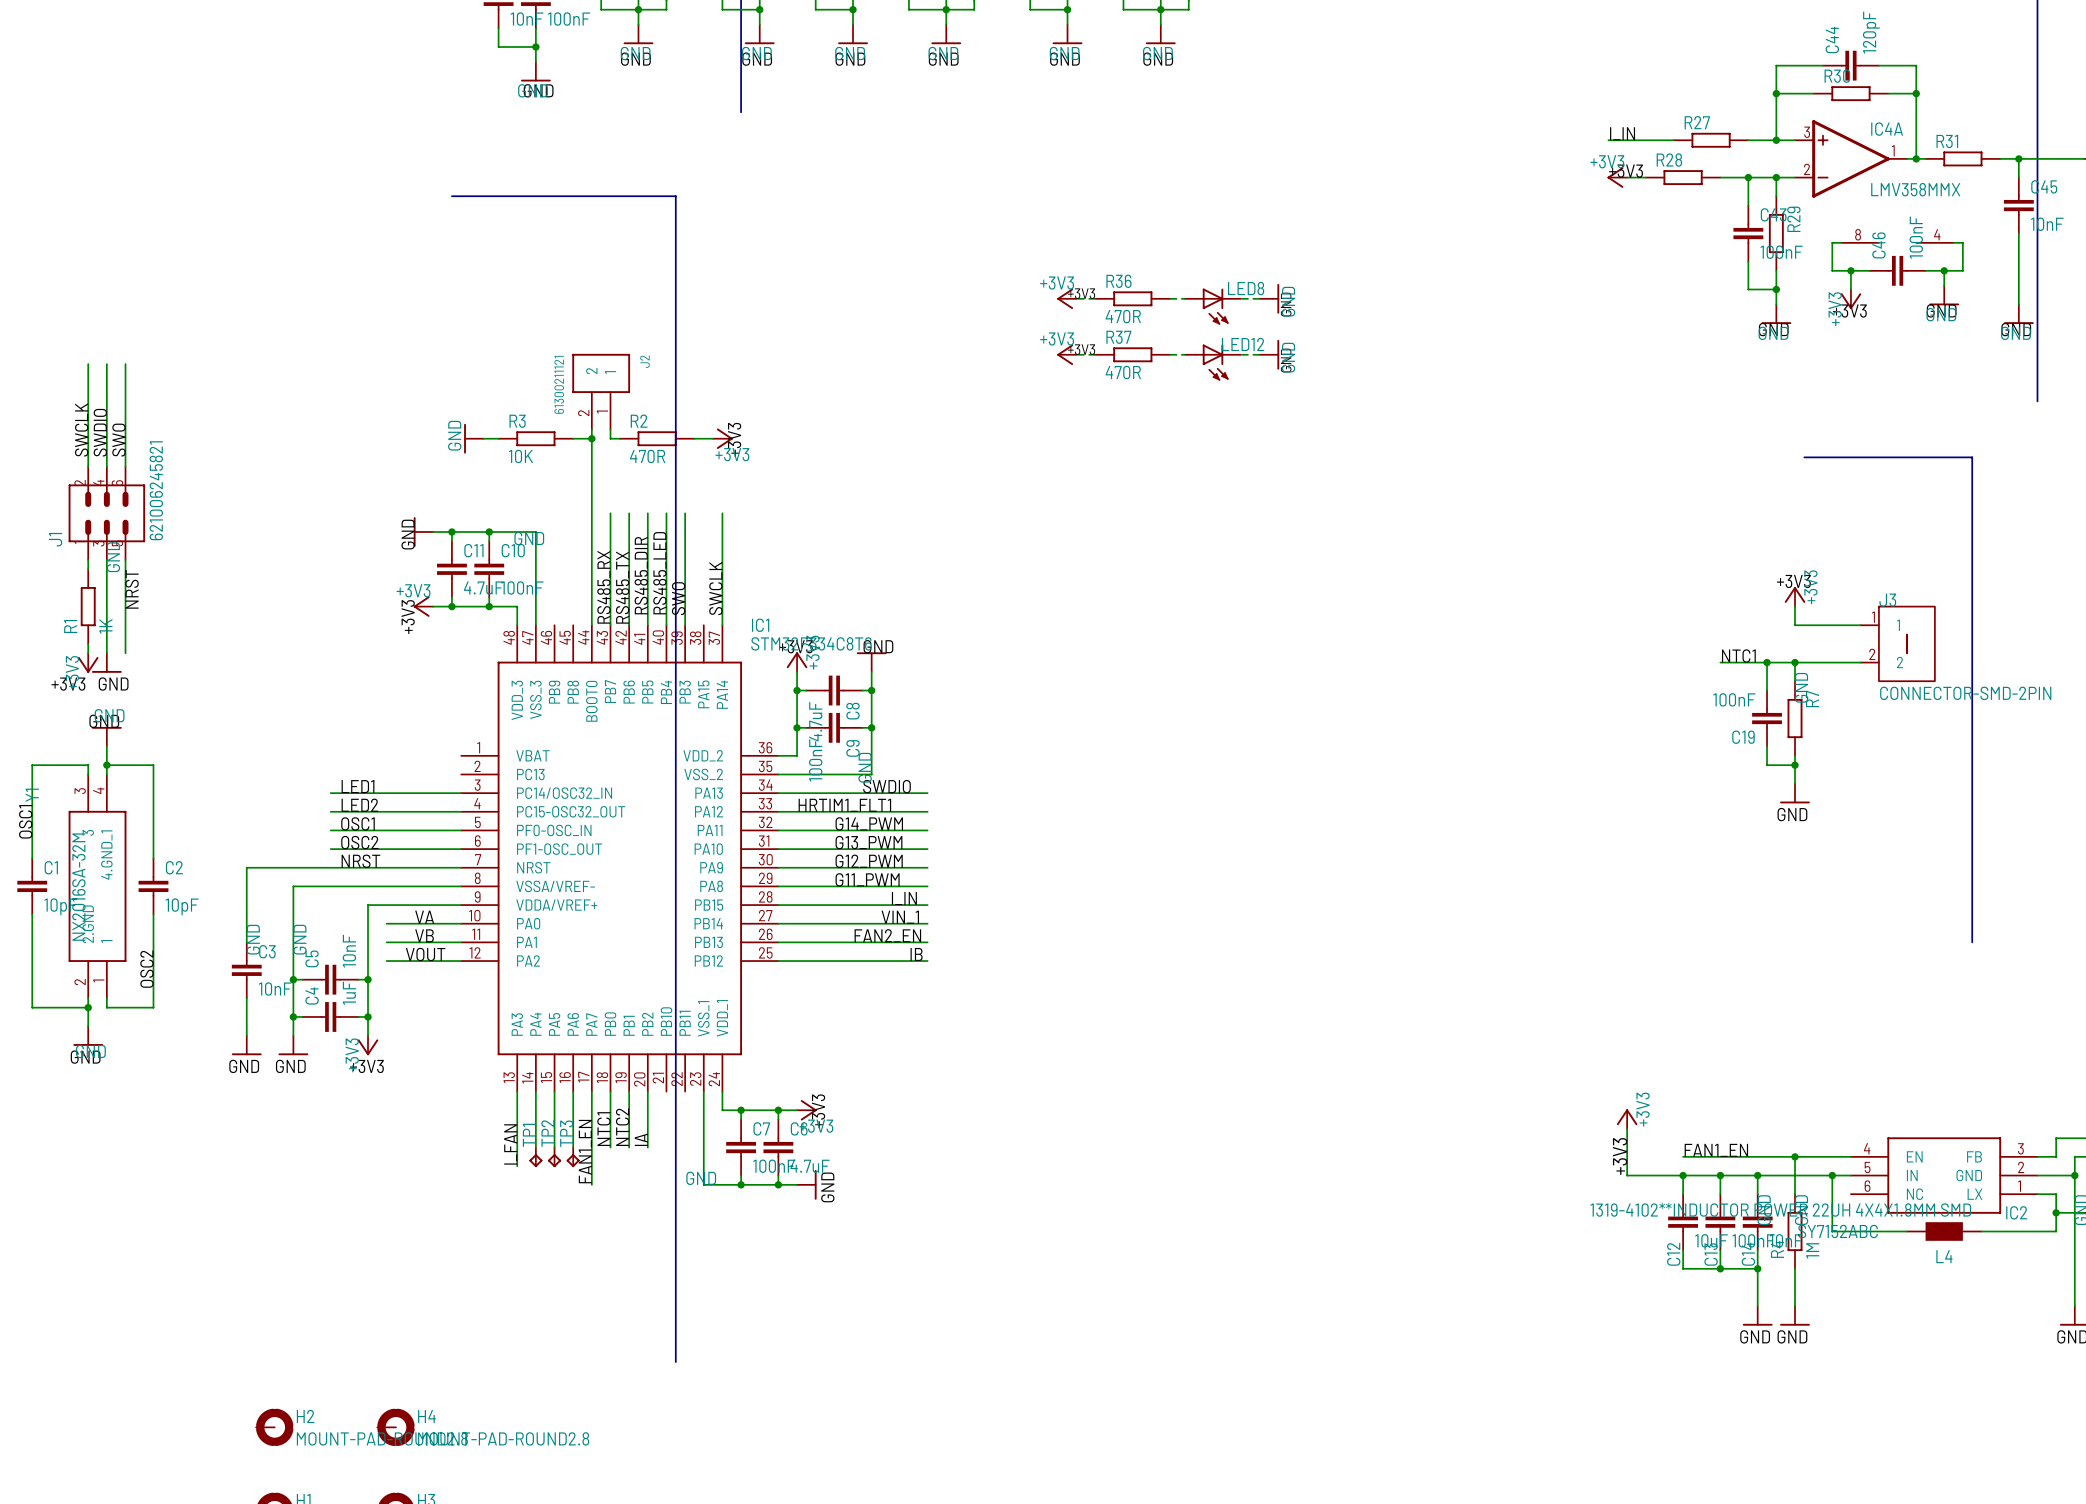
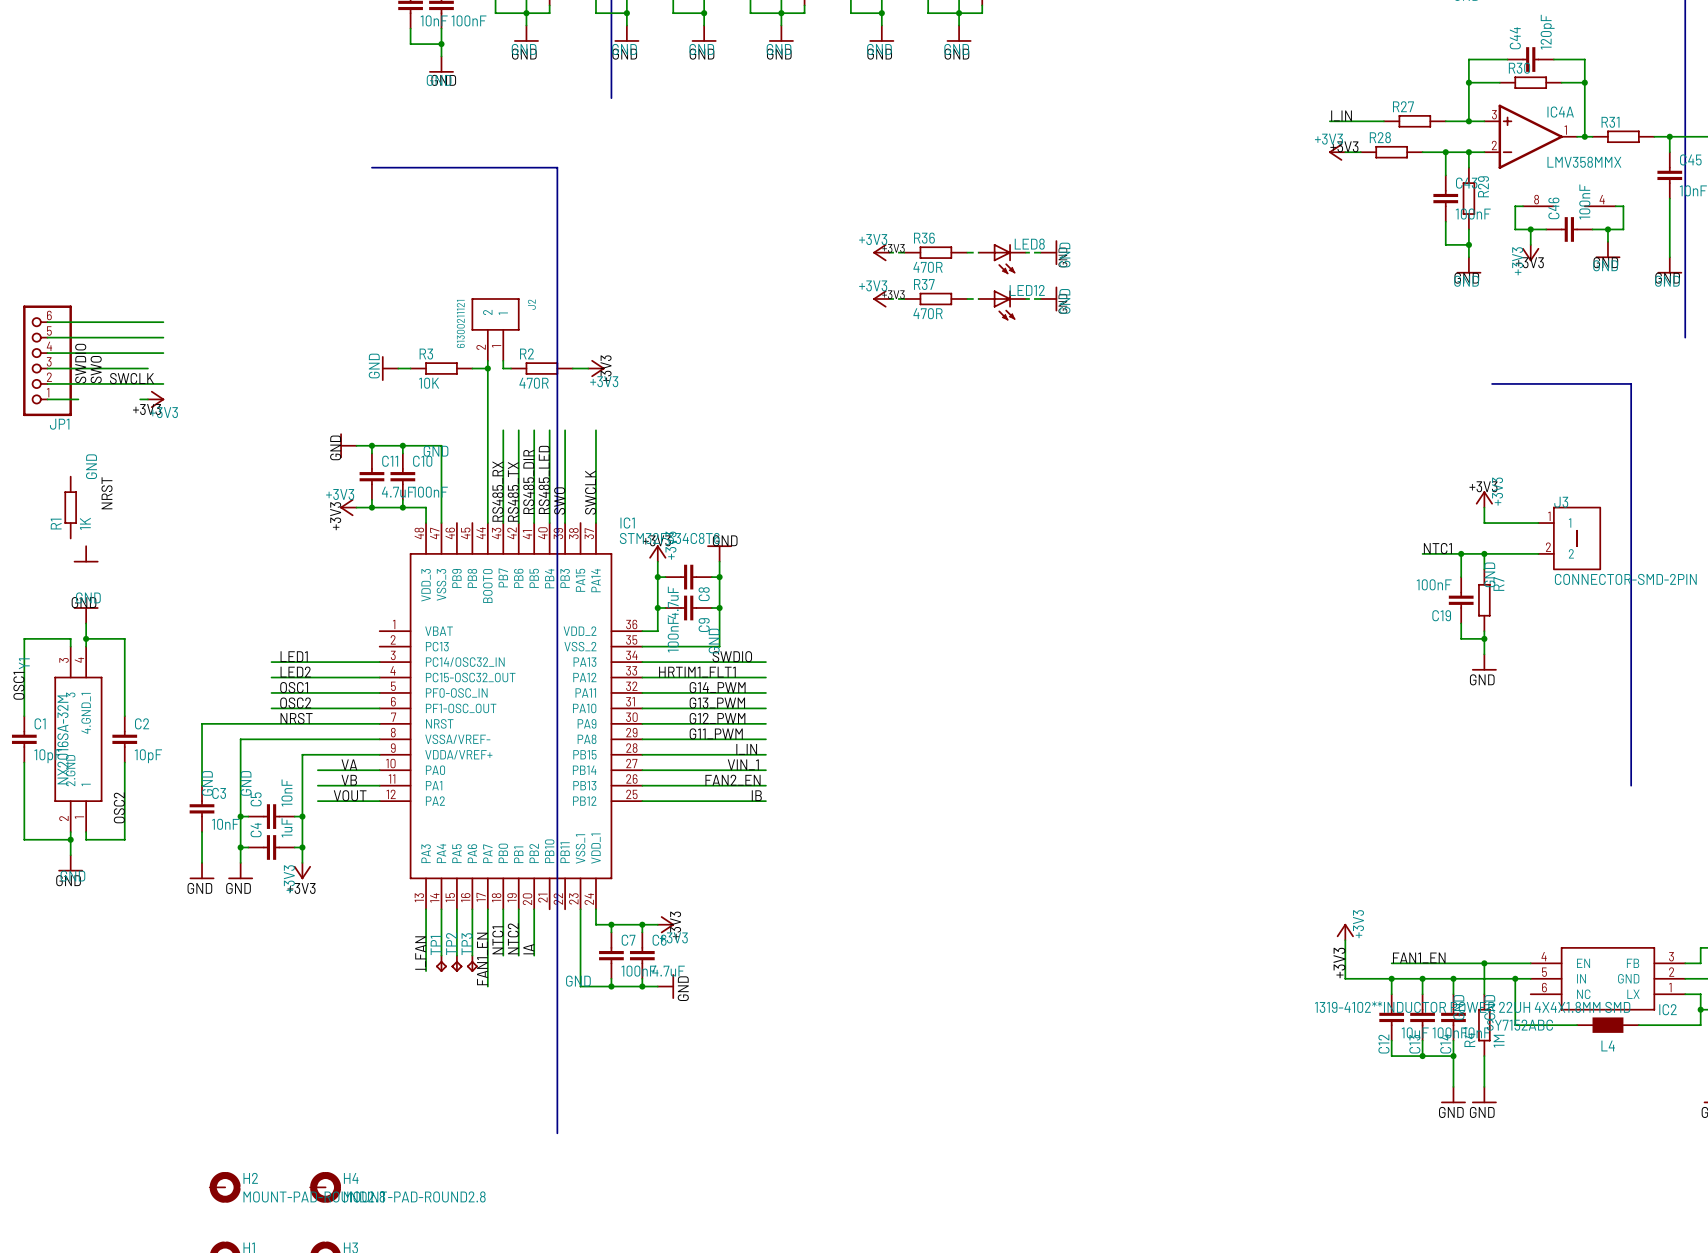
wire: (106, 364) (106, 466) -> none
wire: (125, 364) (125, 466) -> none
wire: none -> (47, 322) (163, 322)
wire: none -> (47, 337) (163, 337)
wire: none -> (47, 353) (163, 353)
JP1: none -> (47, 360)
label rotation: 0° (81, 429) -> 90° clockwise (132, 378)
label position: SWCLK (81, 429) -> SWCLK (132, 378)
wire: none -> (47, 368) (147, 368)
wire: none -> (47, 383) (163, 383)
wire: none -> (47, 399) (78, 399)
wire: none -> (140, 399) (147, 399)
power symbol: none -> +3V3 (156, 399)
label: none -> +3V3 (147, 409)
J1: 621006245821 (106, 513) -> none
wire: (88, 559) (88, 569) -> none
wire: (106, 559) (106, 653) -> none
wire: (125, 559) (125, 653) -> none
wire: (88, 643) (88, 653) -> none
power symbol: +3V3 (88, 663) -> none
label: +3V3 (68, 684) -> none
label: GND (113, 684) -> none

